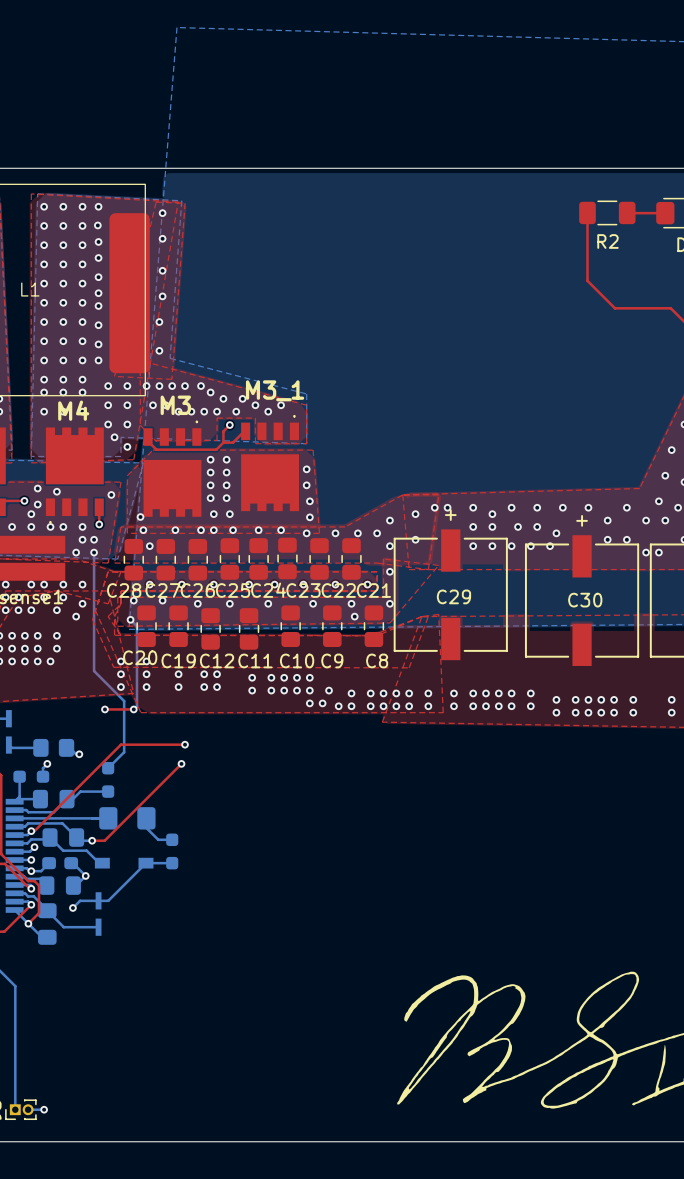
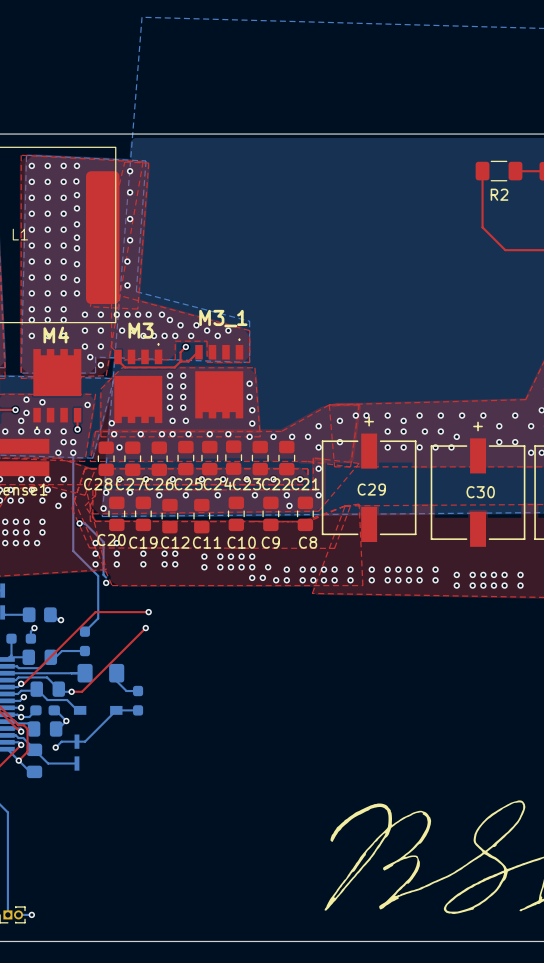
bottom track: (130, 619) (136, 626) (136, 706) (133, 709) -> none
bottom track: none -> (79, 523) (84, 523) (103, 542) (103, 574) (106, 577)
top track: (104, 709) (133, 709) -> none
via position: (104, 709) -> (79, 523)

